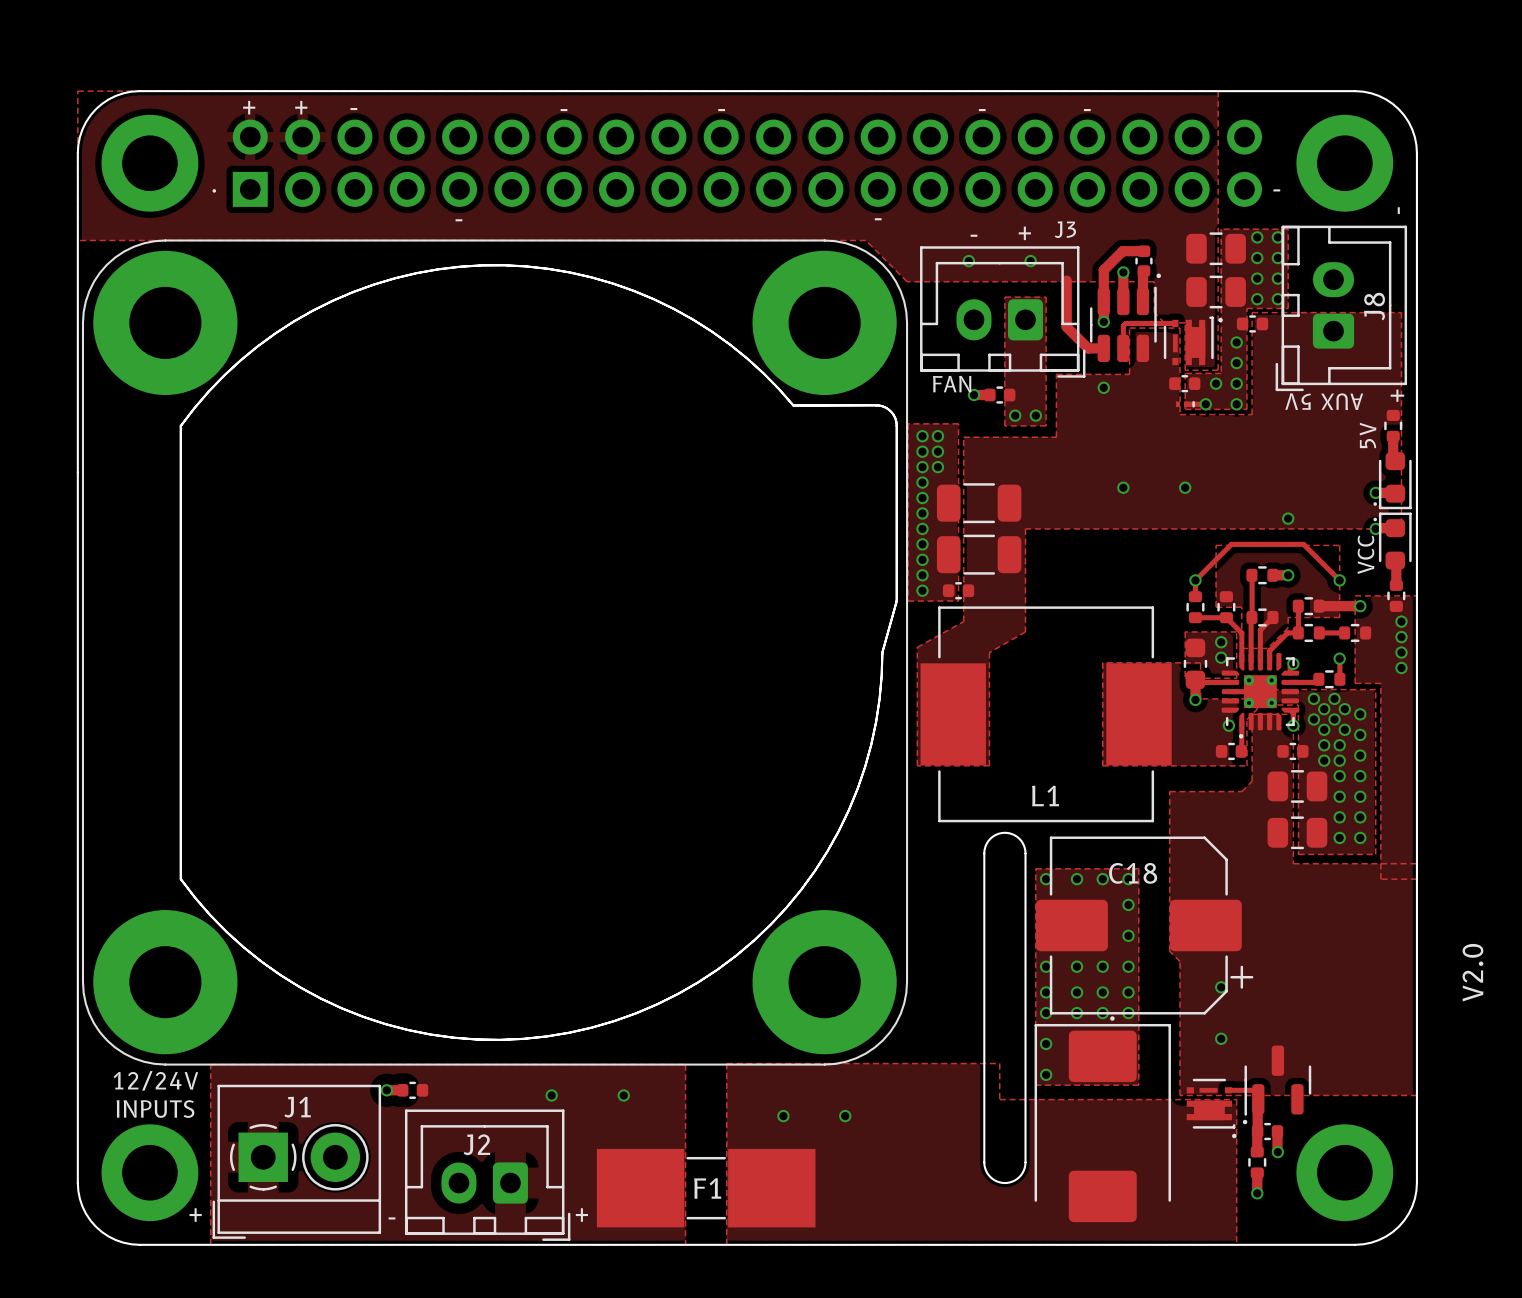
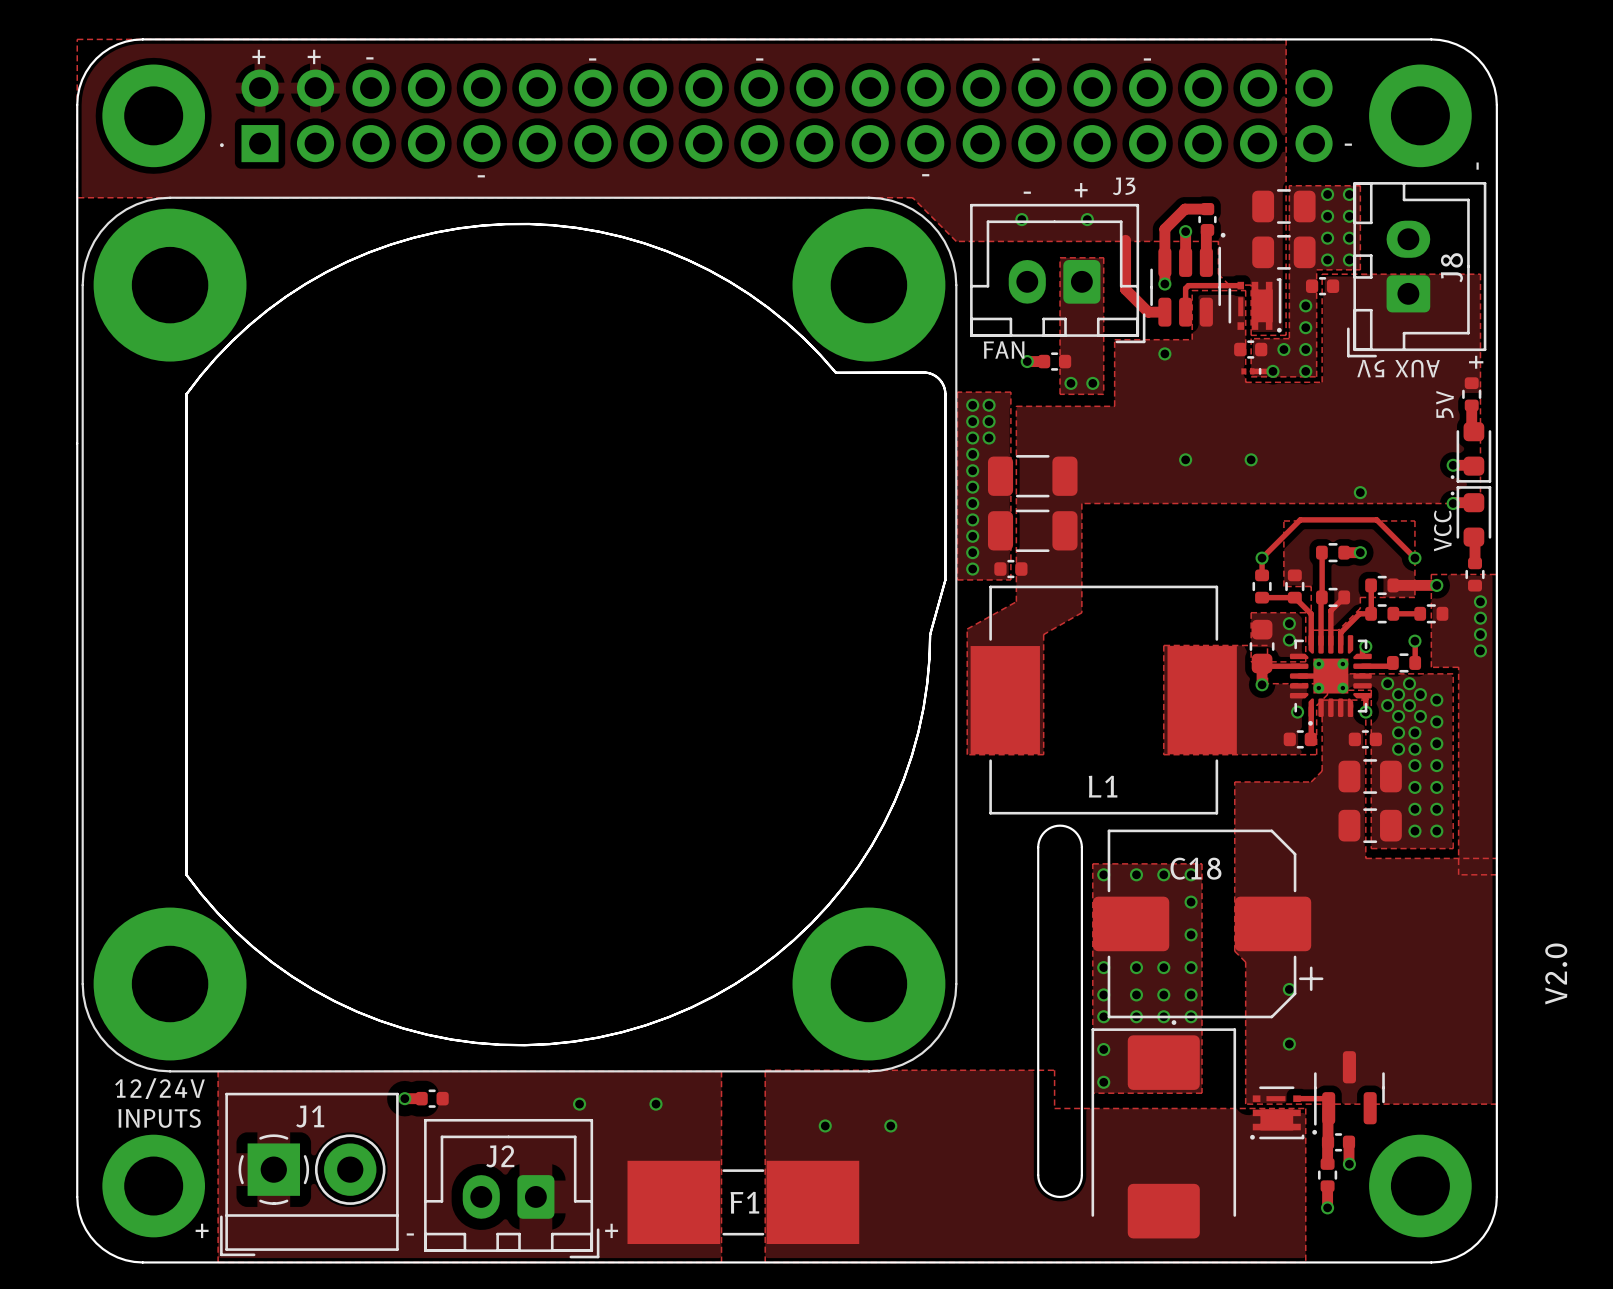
text position: . (1220, 320) -> . (1279, 330)
text position: . (1234, 1136) -> . (1252, 1137)

